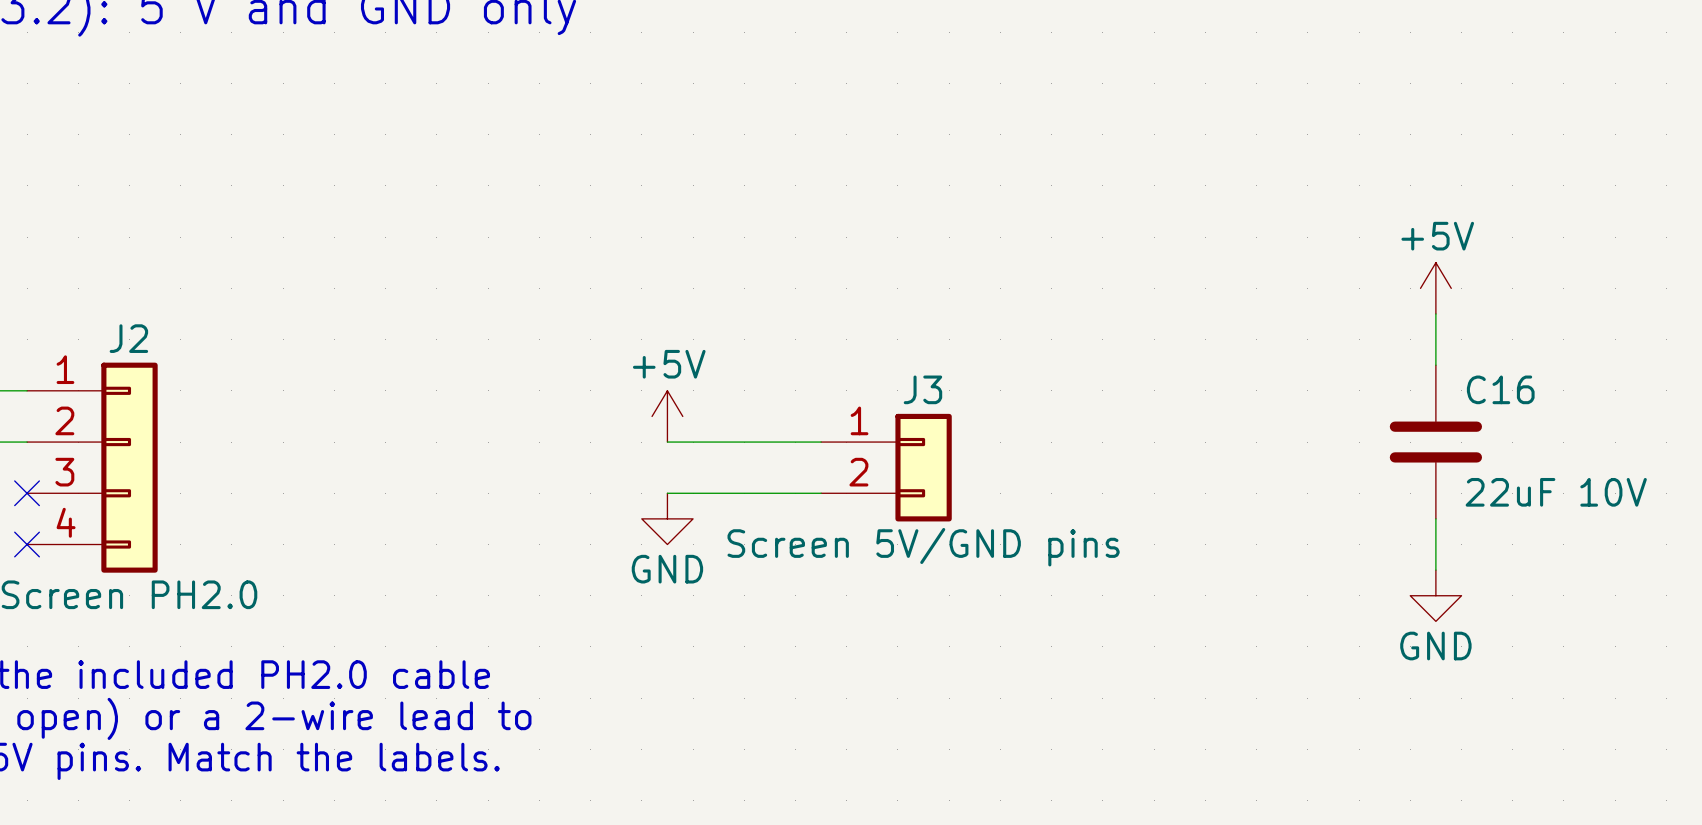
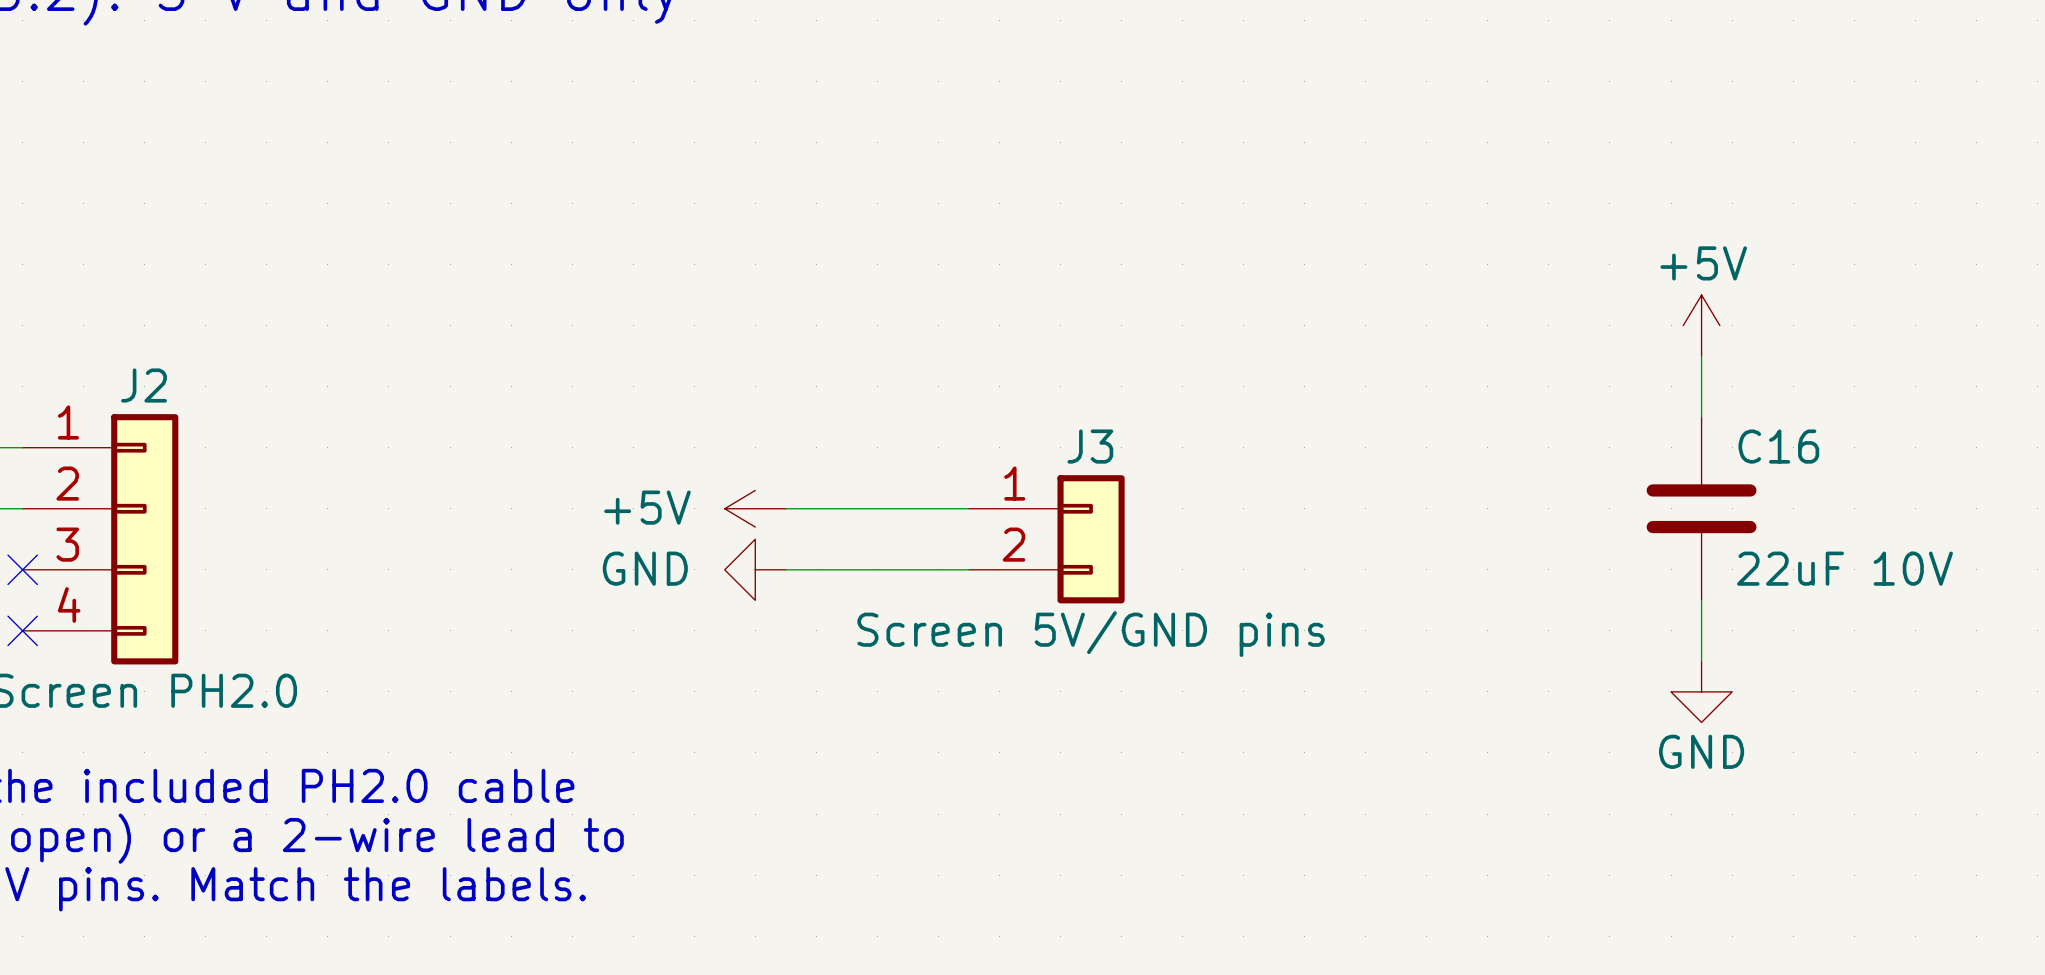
power symbol text position: +5V (669, 364) -> +5V (647, 507)
power symbol rotation: 0° (667, 416) -> 90° counterclockwise (755, 508)
power symbol position: +5V (667, 416) -> +5V (755, 508)
power symbol rotation: 0° (667, 518) -> 90° clockwise (755, 569)
power symbol position: GND (667, 518) -> GND (755, 569)
power symbol text position: GND (667, 569) -> GND (645, 568)

